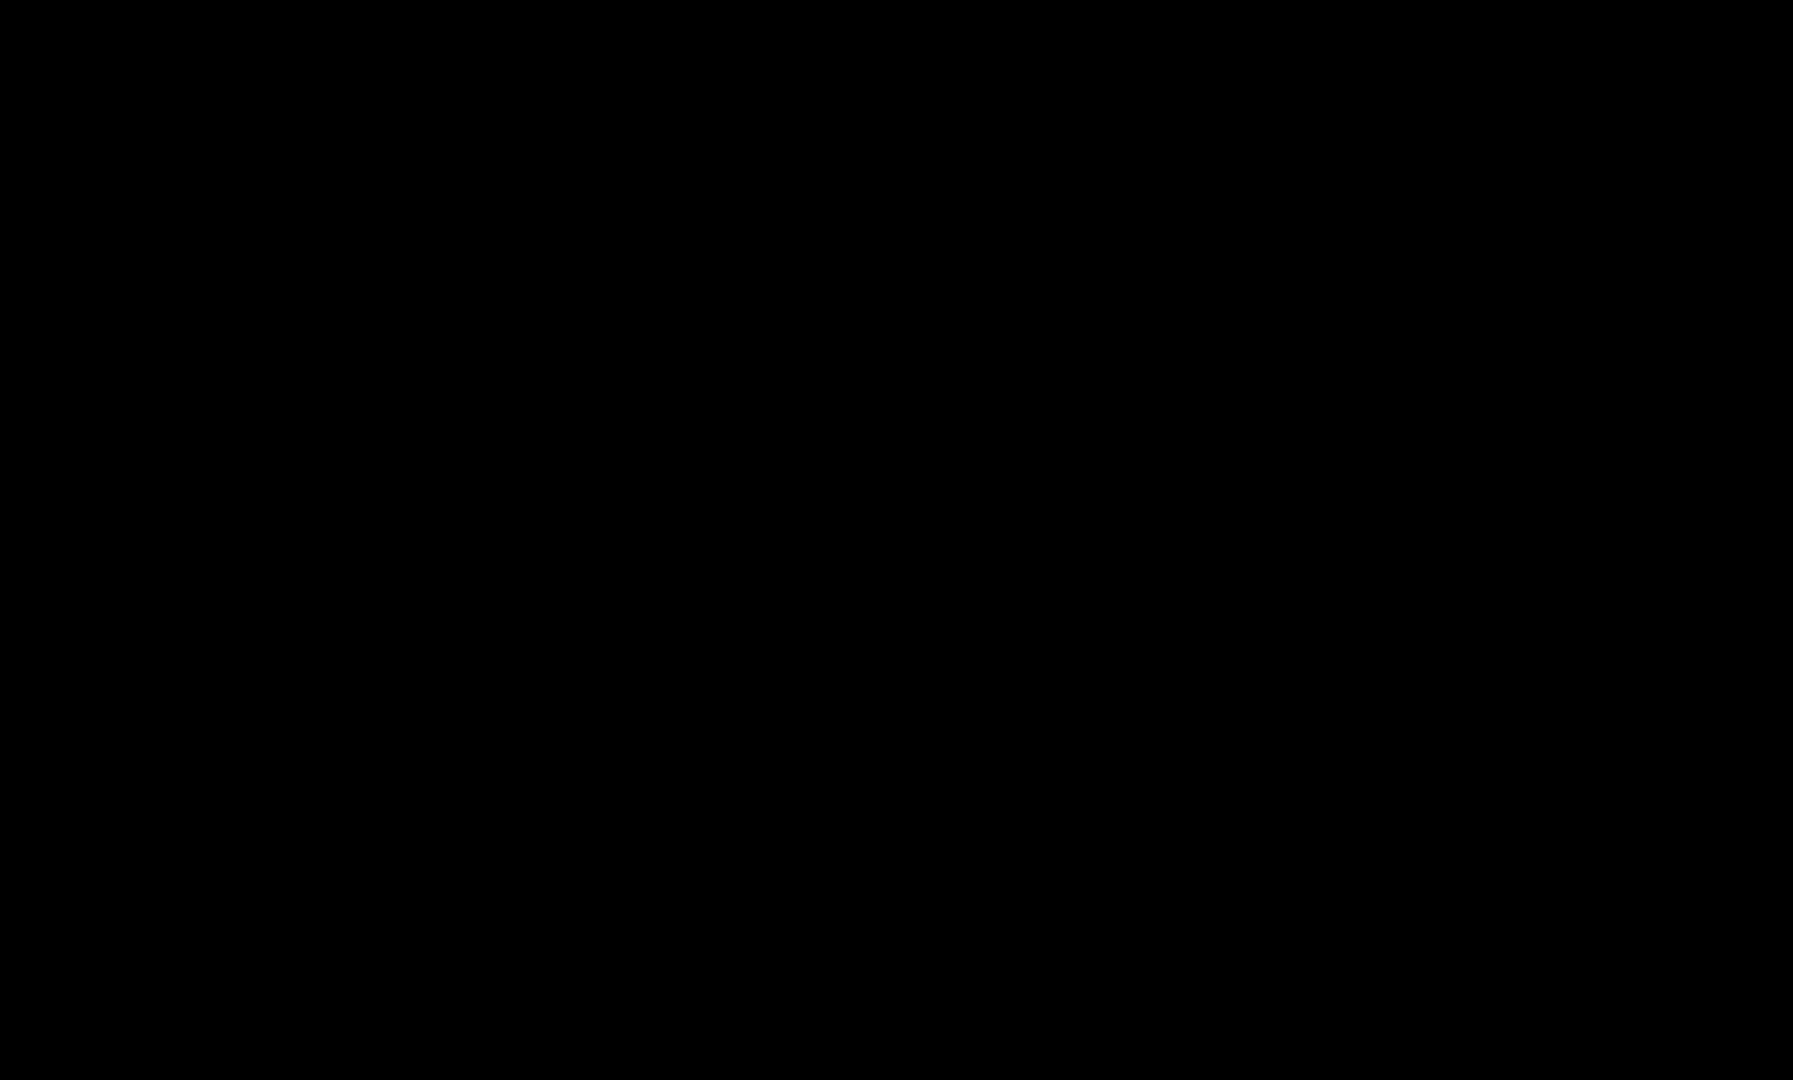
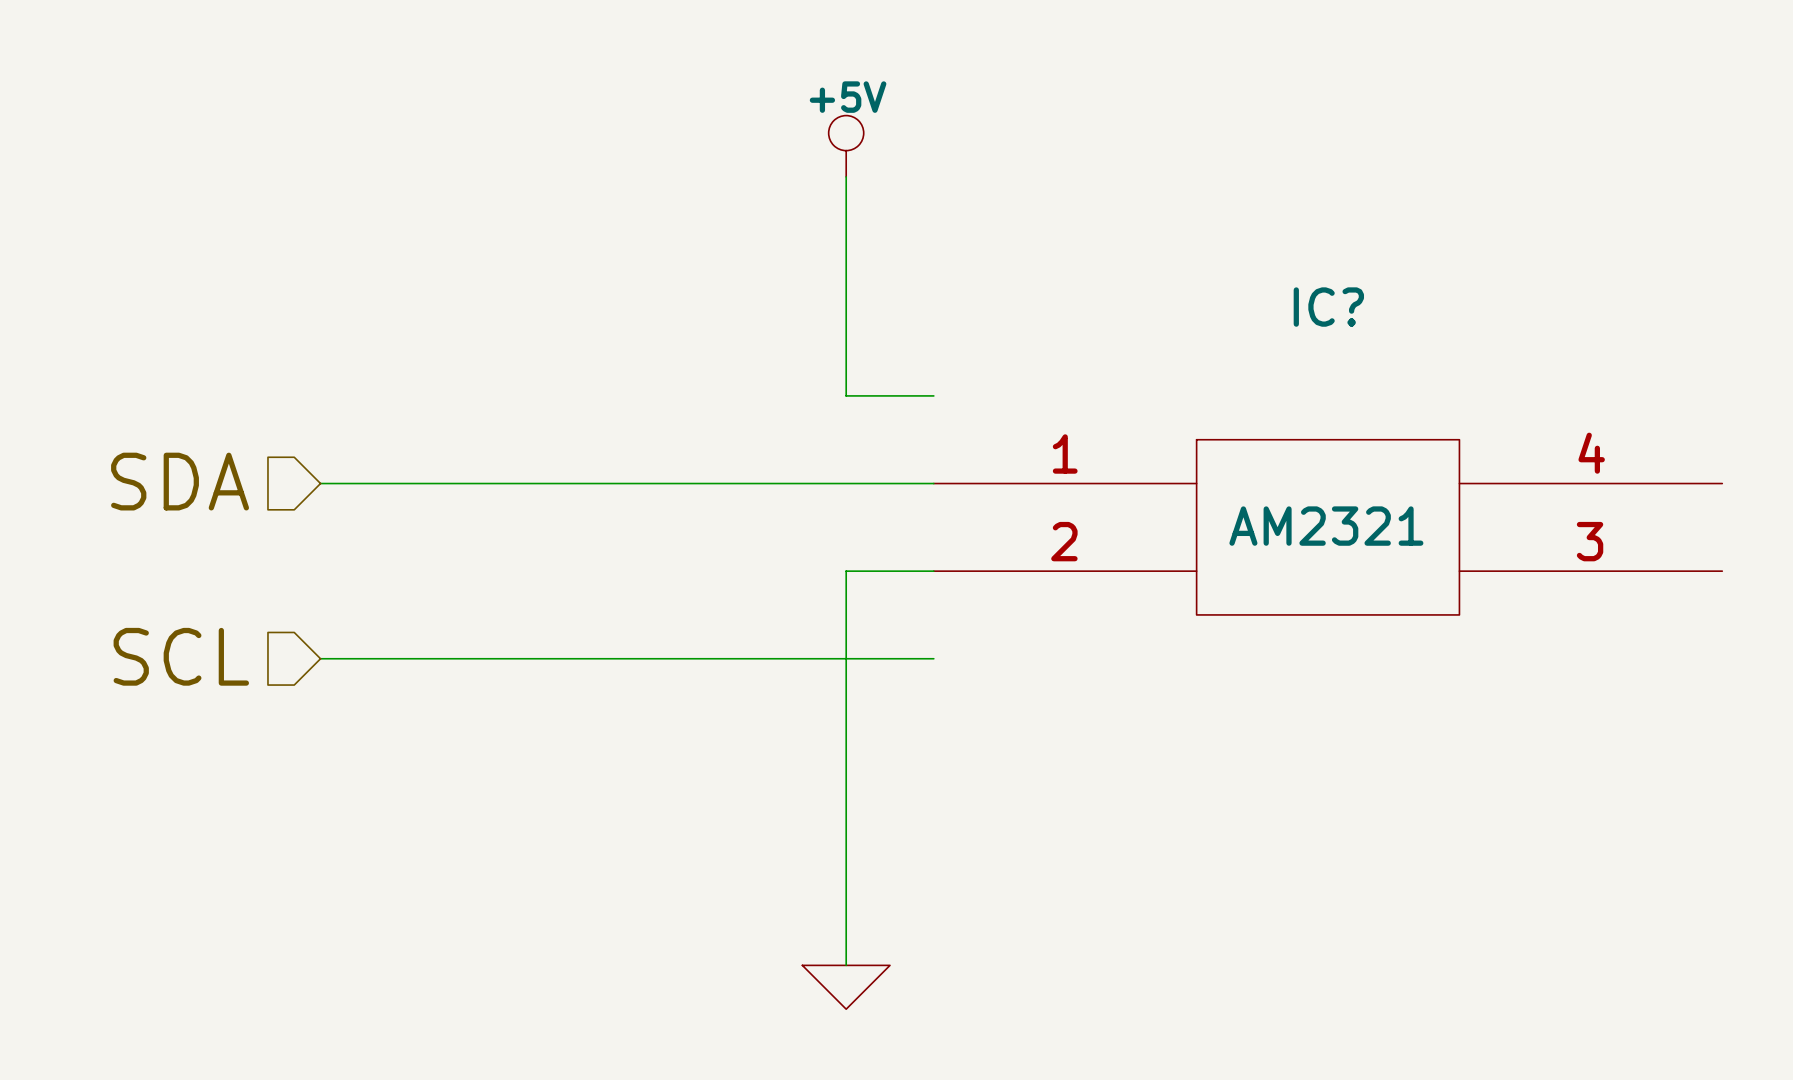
power symbol: none -> +5V (846, 146)
wire: none -> (846, 176) (846, 395) (933, 395)
hierarchical label: none -> SDA (180, 481)
wire: none -> (320, 483) (933, 483)
IC?: none -> AM2321 (1328, 527)
wire: none -> (933, 571) (846, 571) (846, 965)
hierarchical label: none -> SCL (181, 656)
wire: none -> (320, 658) (933, 658)
power symbol: none -> (846, 987)

